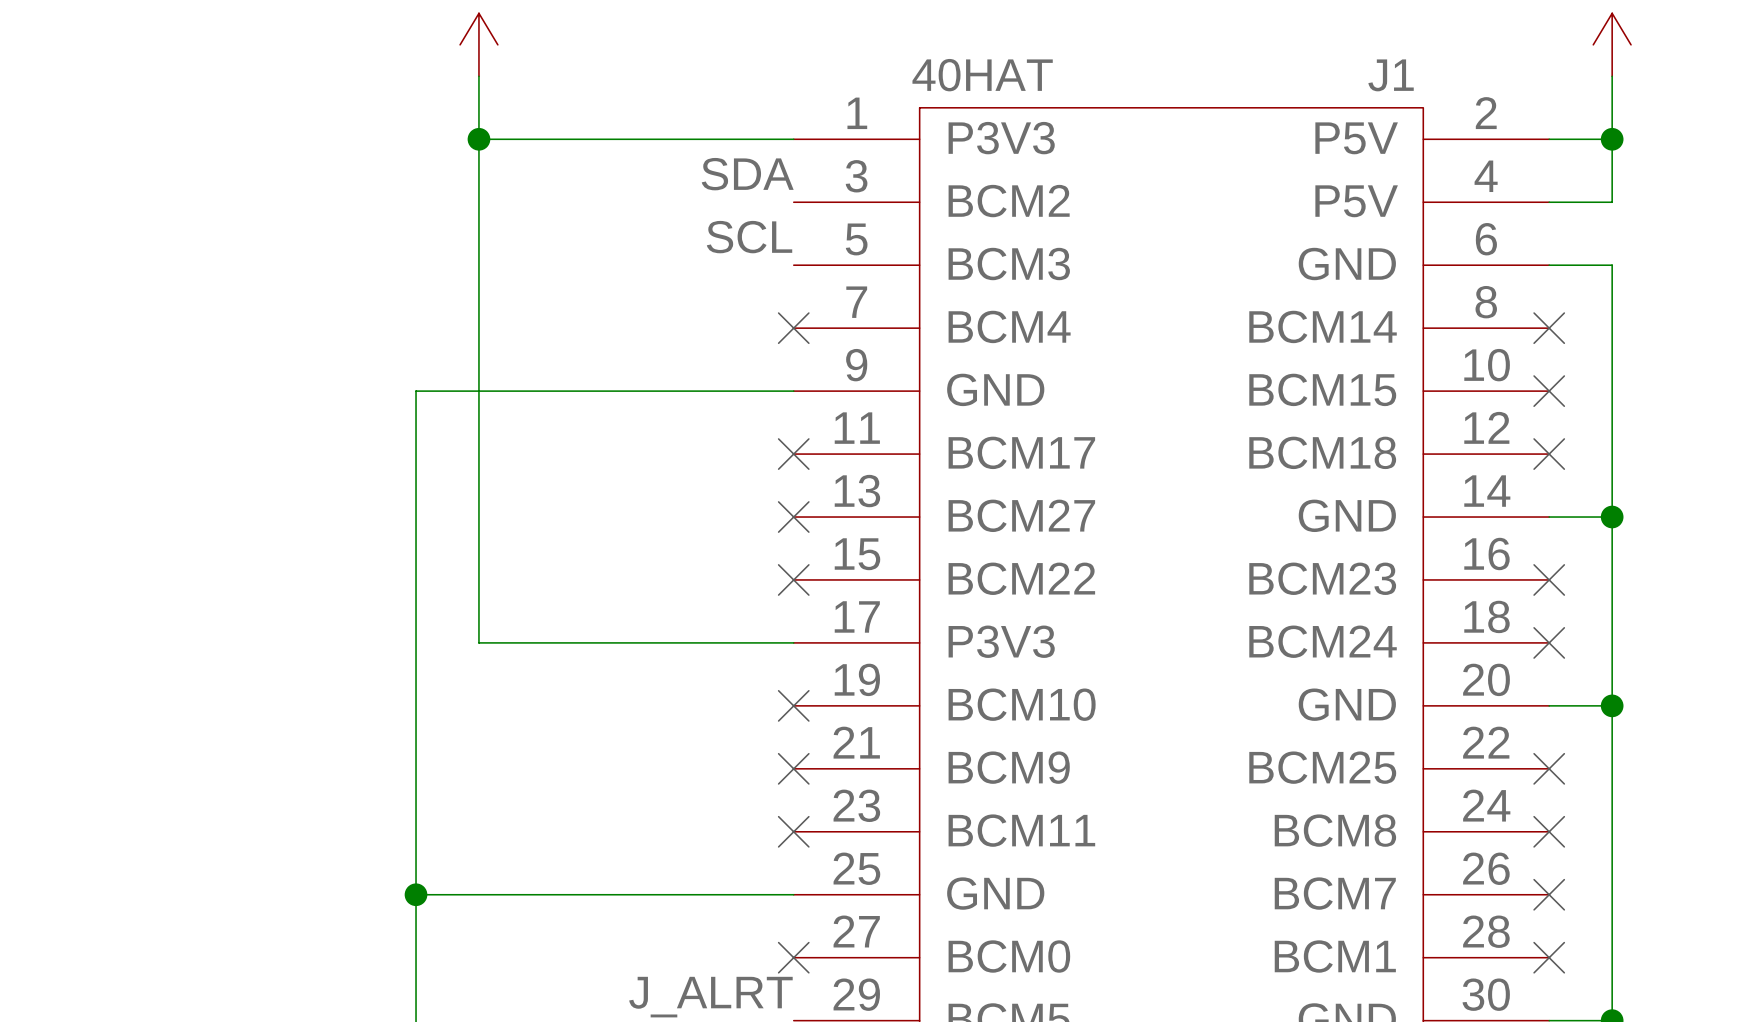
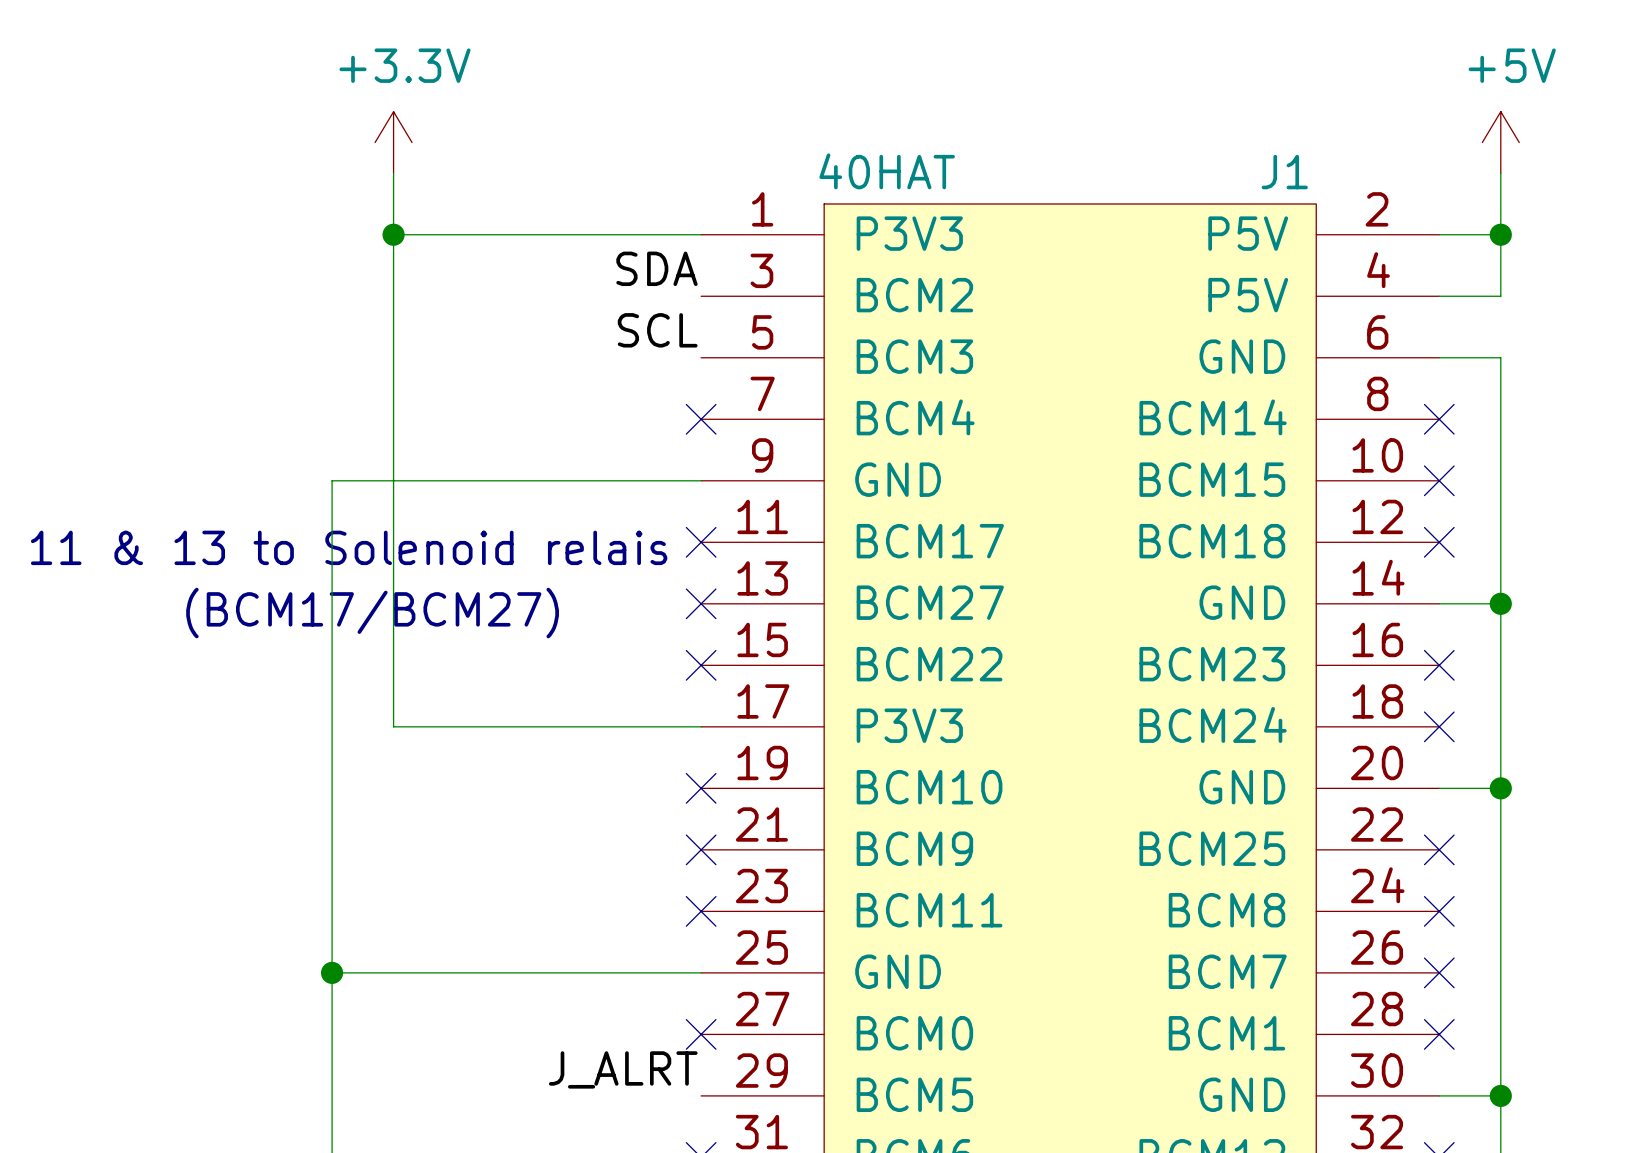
text: none -> 11 & 13 to Solenoid relais (349, 547)
text: none -> (BCM17/BCM27) (372, 613)

